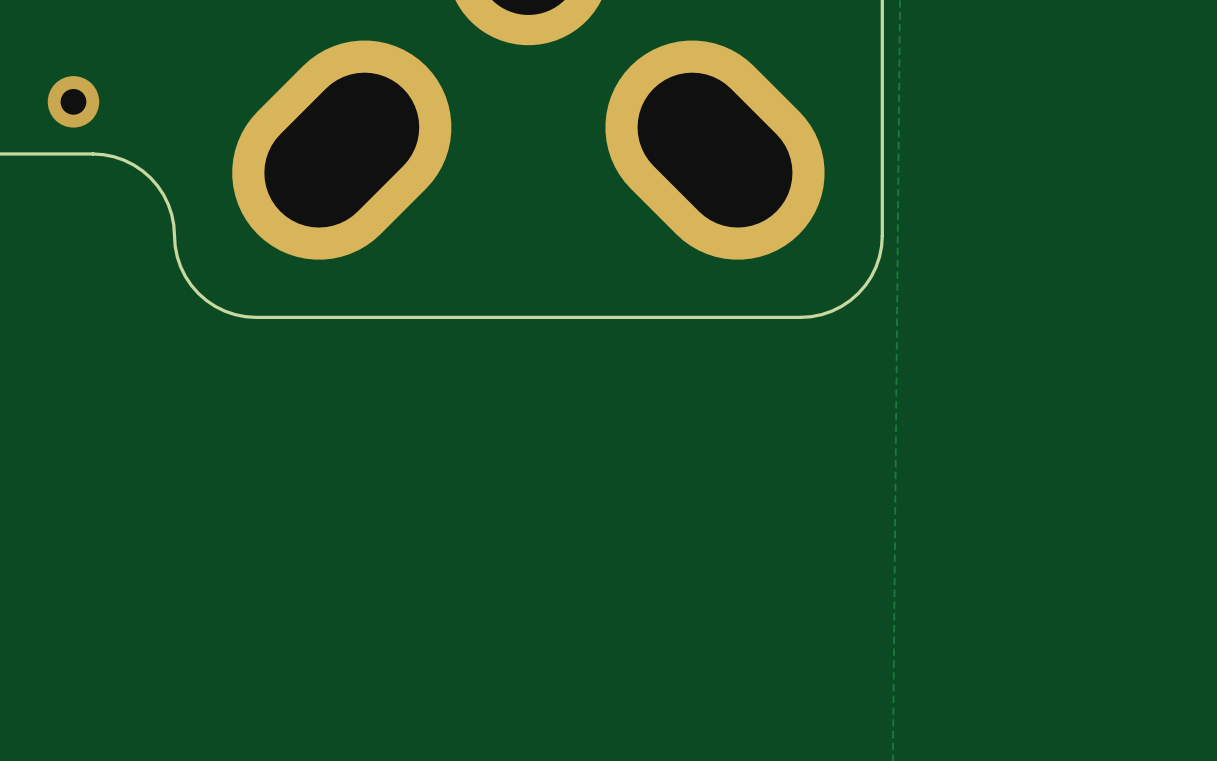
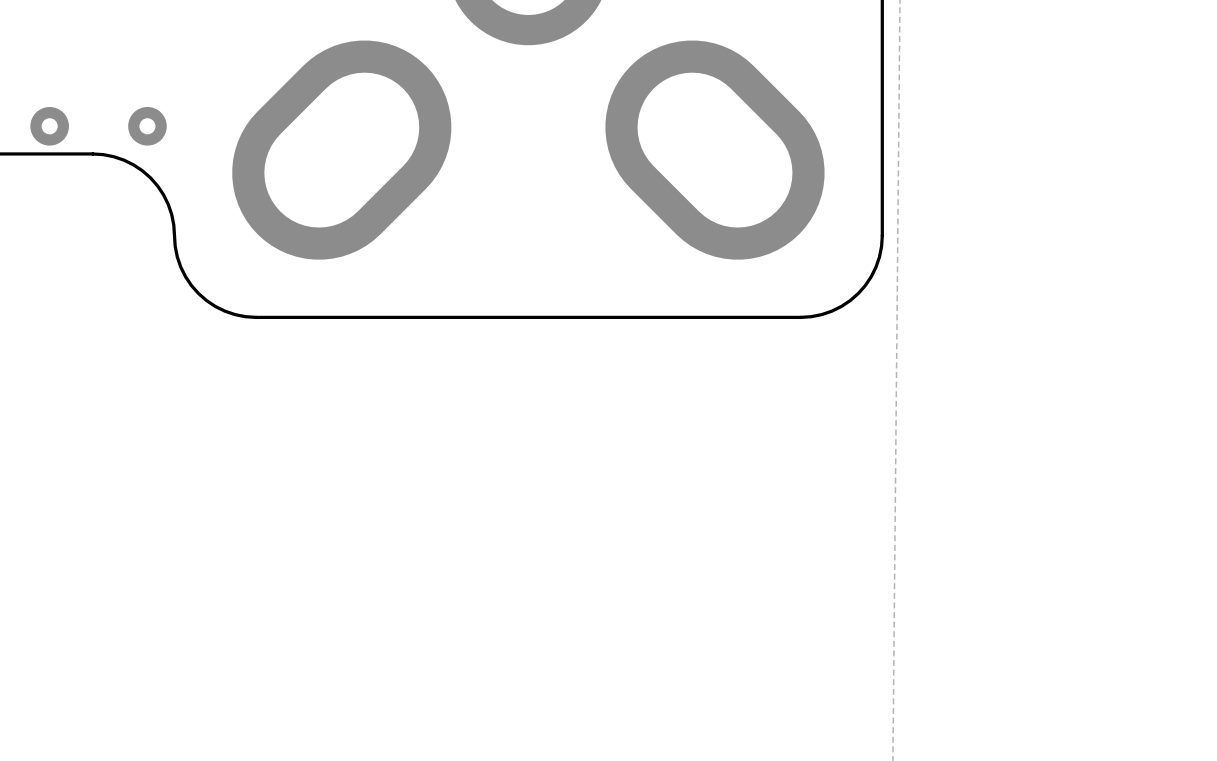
via position: (73, 101) -> (49, 126)
via: none -> (147, 126)

